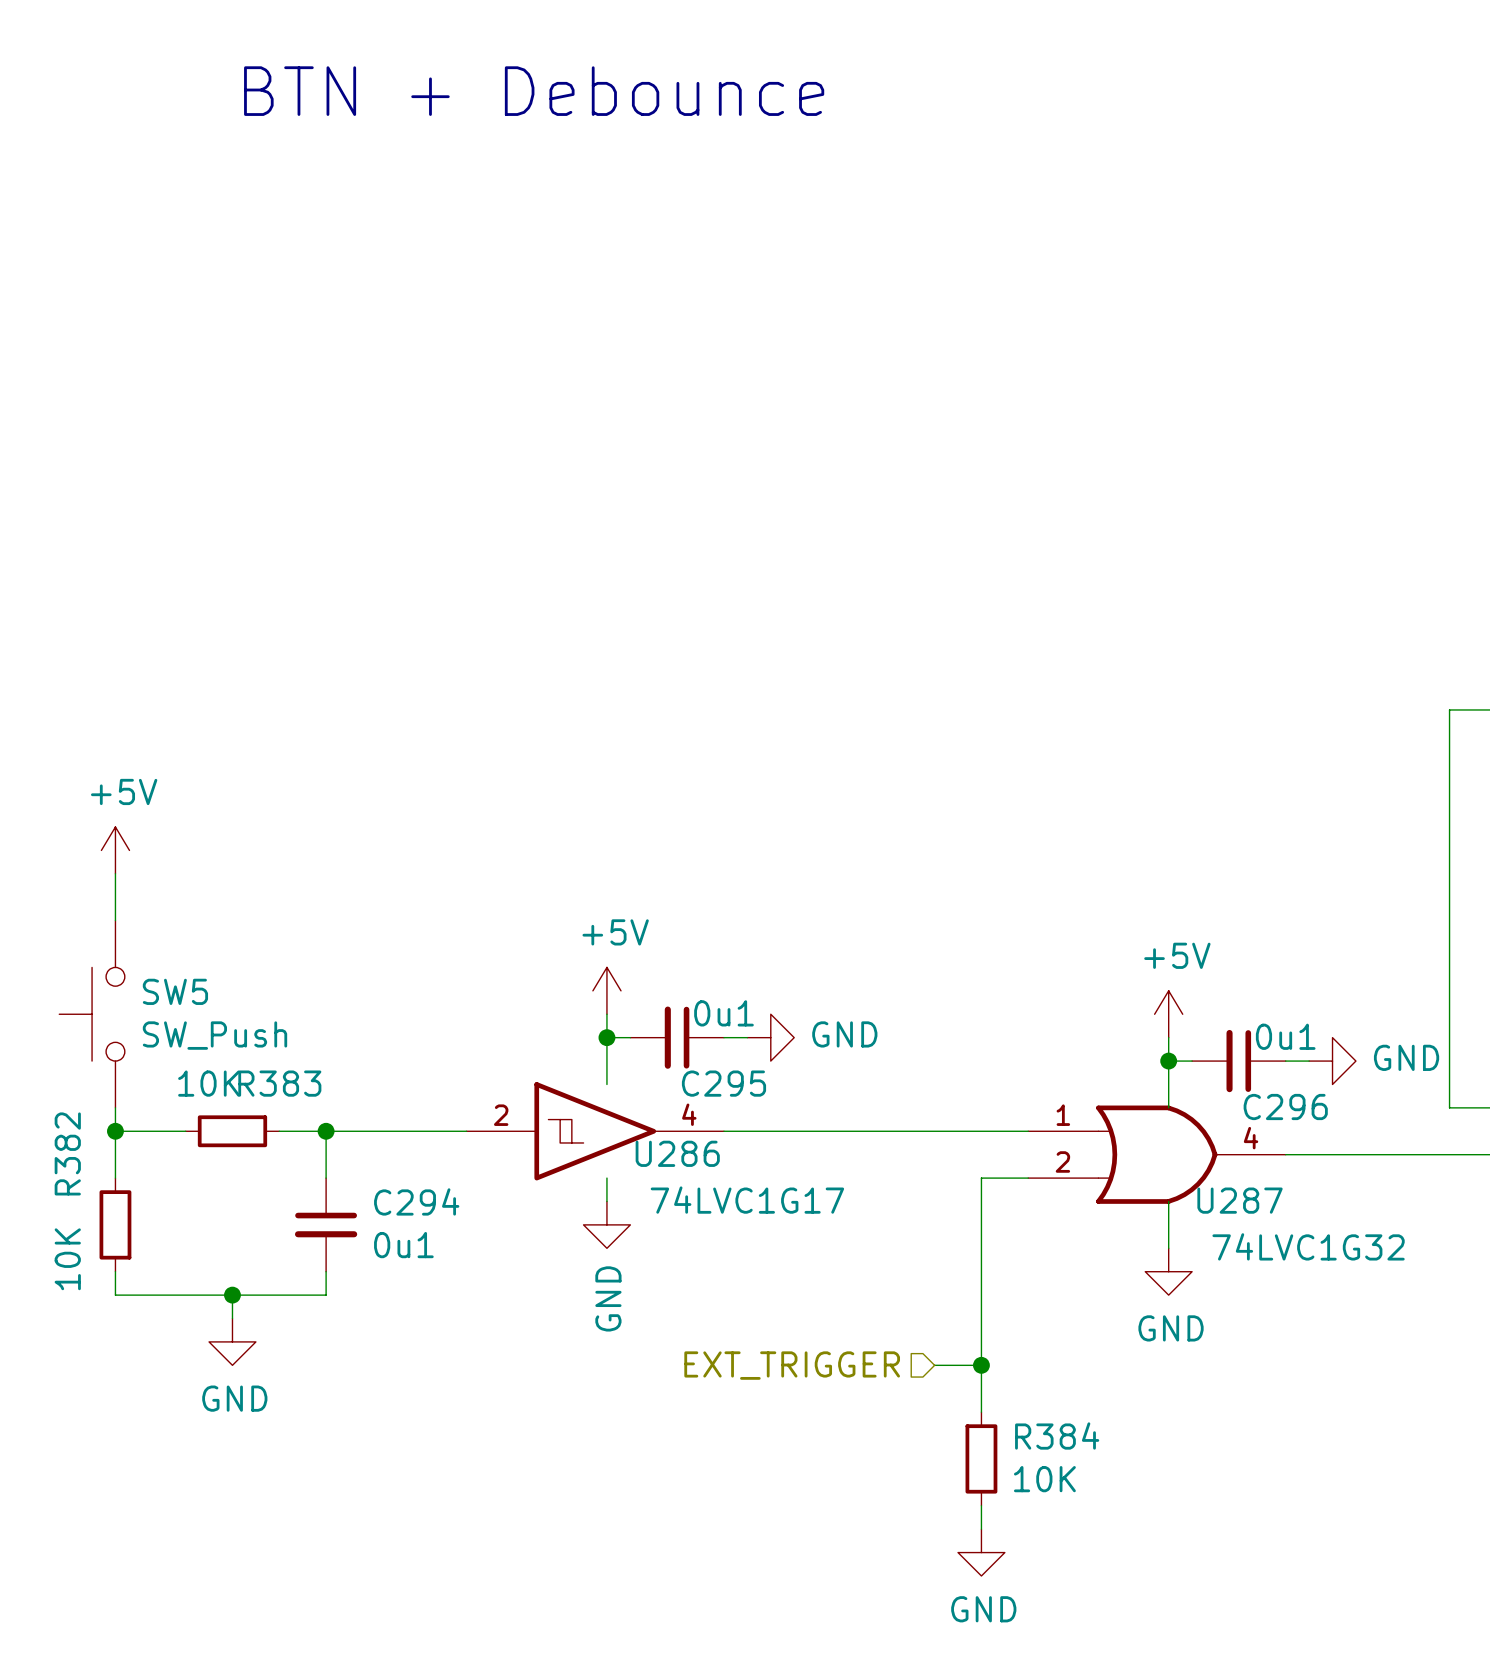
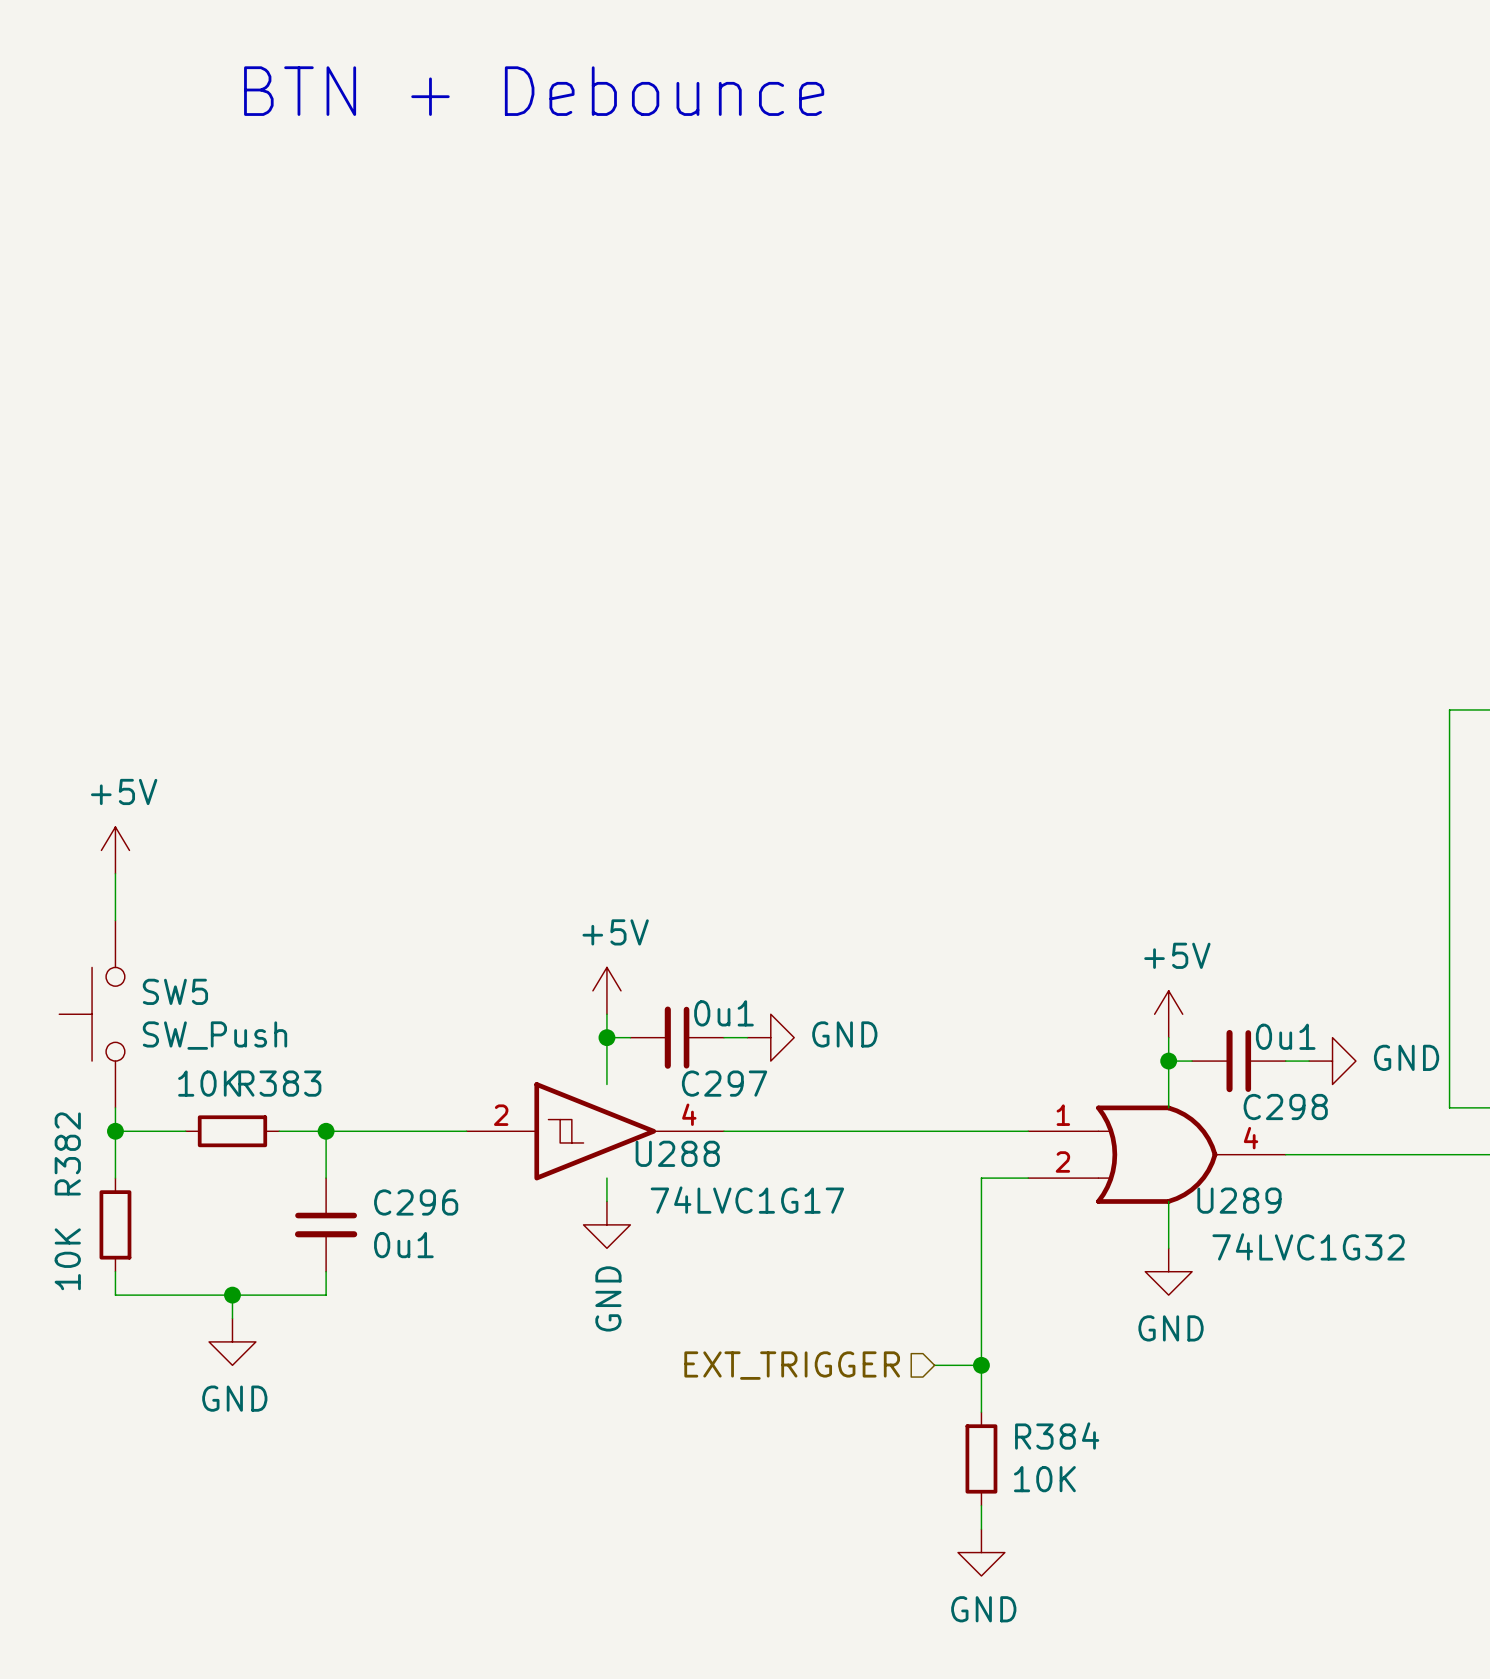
C295 name: C295 (723, 1083) -> C297 (724, 1083)
C296 name: C296 (1285, 1107) -> C298 (1285, 1107)
U286 name: U286 (677, 1153) -> U288 (677, 1153)
U287 name: U287 (1240, 1200) -> U289 (1239, 1200)
C294 name: C294 (416, 1201) -> C296 (416, 1202)

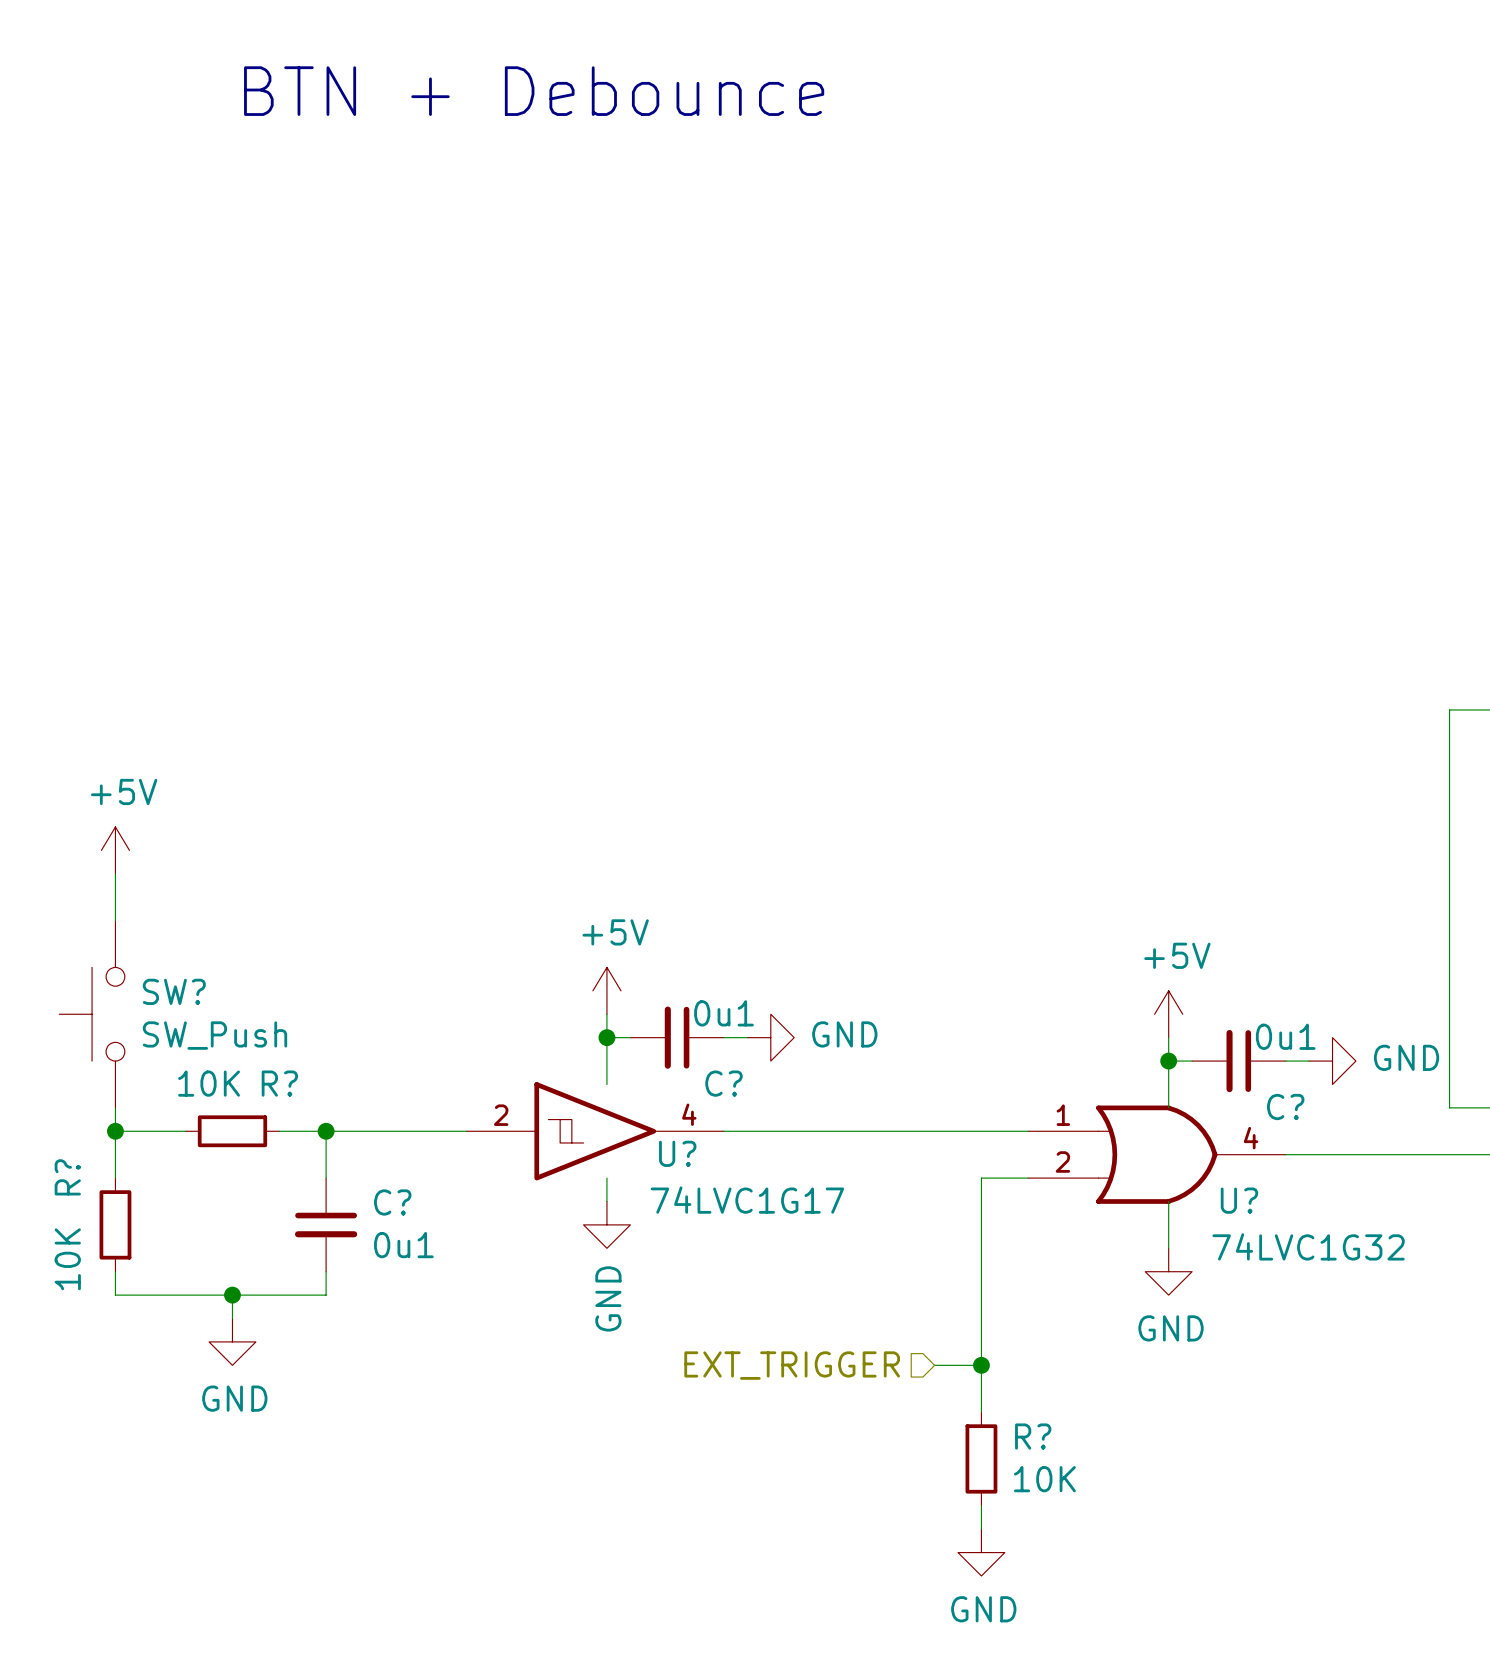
SW5 name: SW5 (175, 991) -> SW? (174, 991)
R383 name: R383 (279, 1083) -> R? (279, 1083)
C297 name: C297 (724, 1083) -> C? (723, 1083)
C298 name: C298 (1285, 1107) -> C? (1285, 1107)
R382 name: R382 (67, 1153) -> R? (67, 1177)
U288 name: U288 (677, 1153) -> U? (677, 1153)
U289 name: U289 (1239, 1200) -> U? (1239, 1200)
C296 name: C296 (416, 1202) -> C? (392, 1202)
R384 name: R384 (1057, 1435) -> R? (1033, 1436)

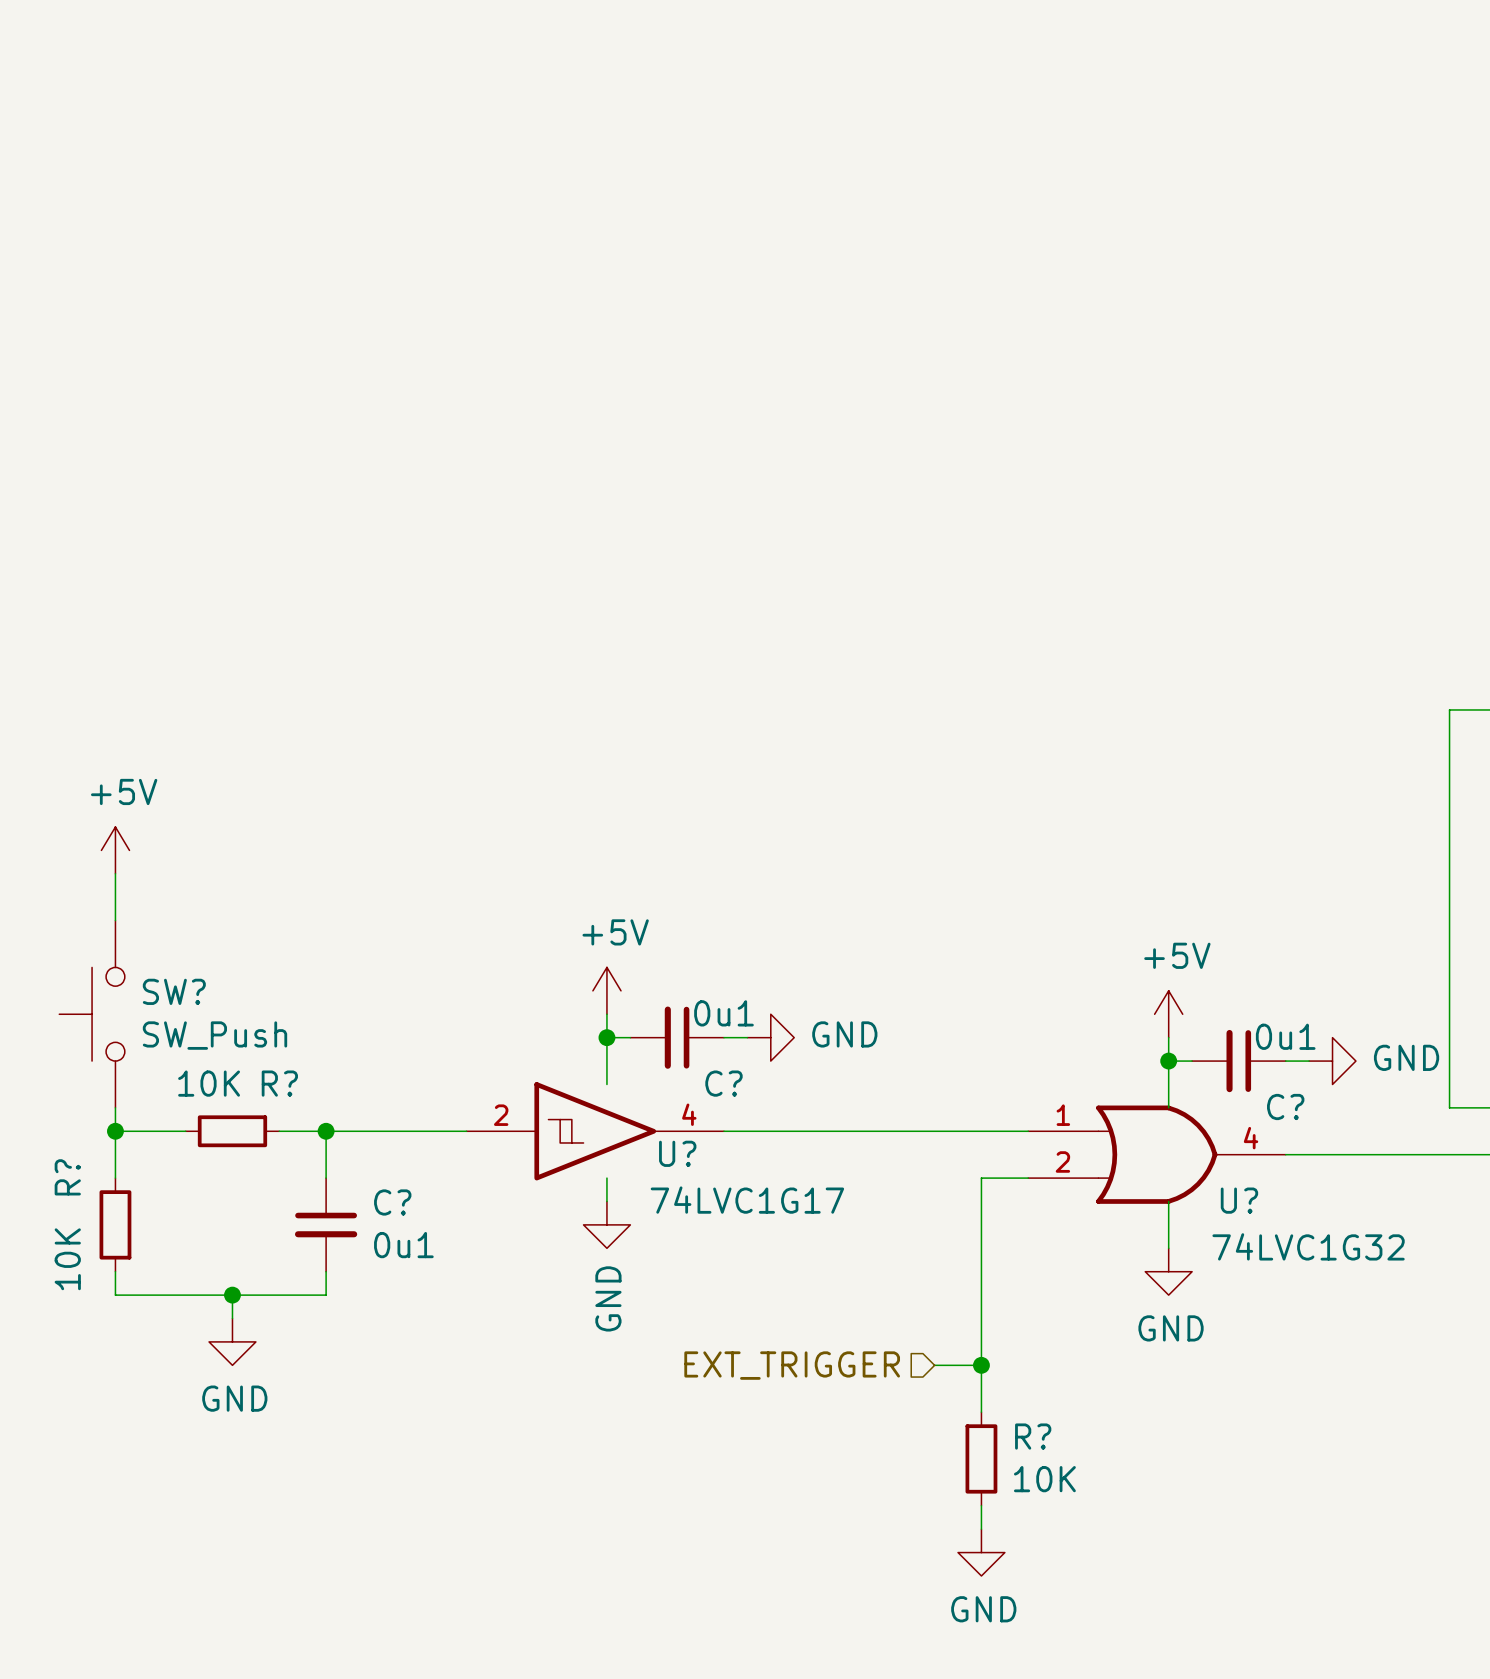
text: BTN + Debounce (534, 91) -> none

